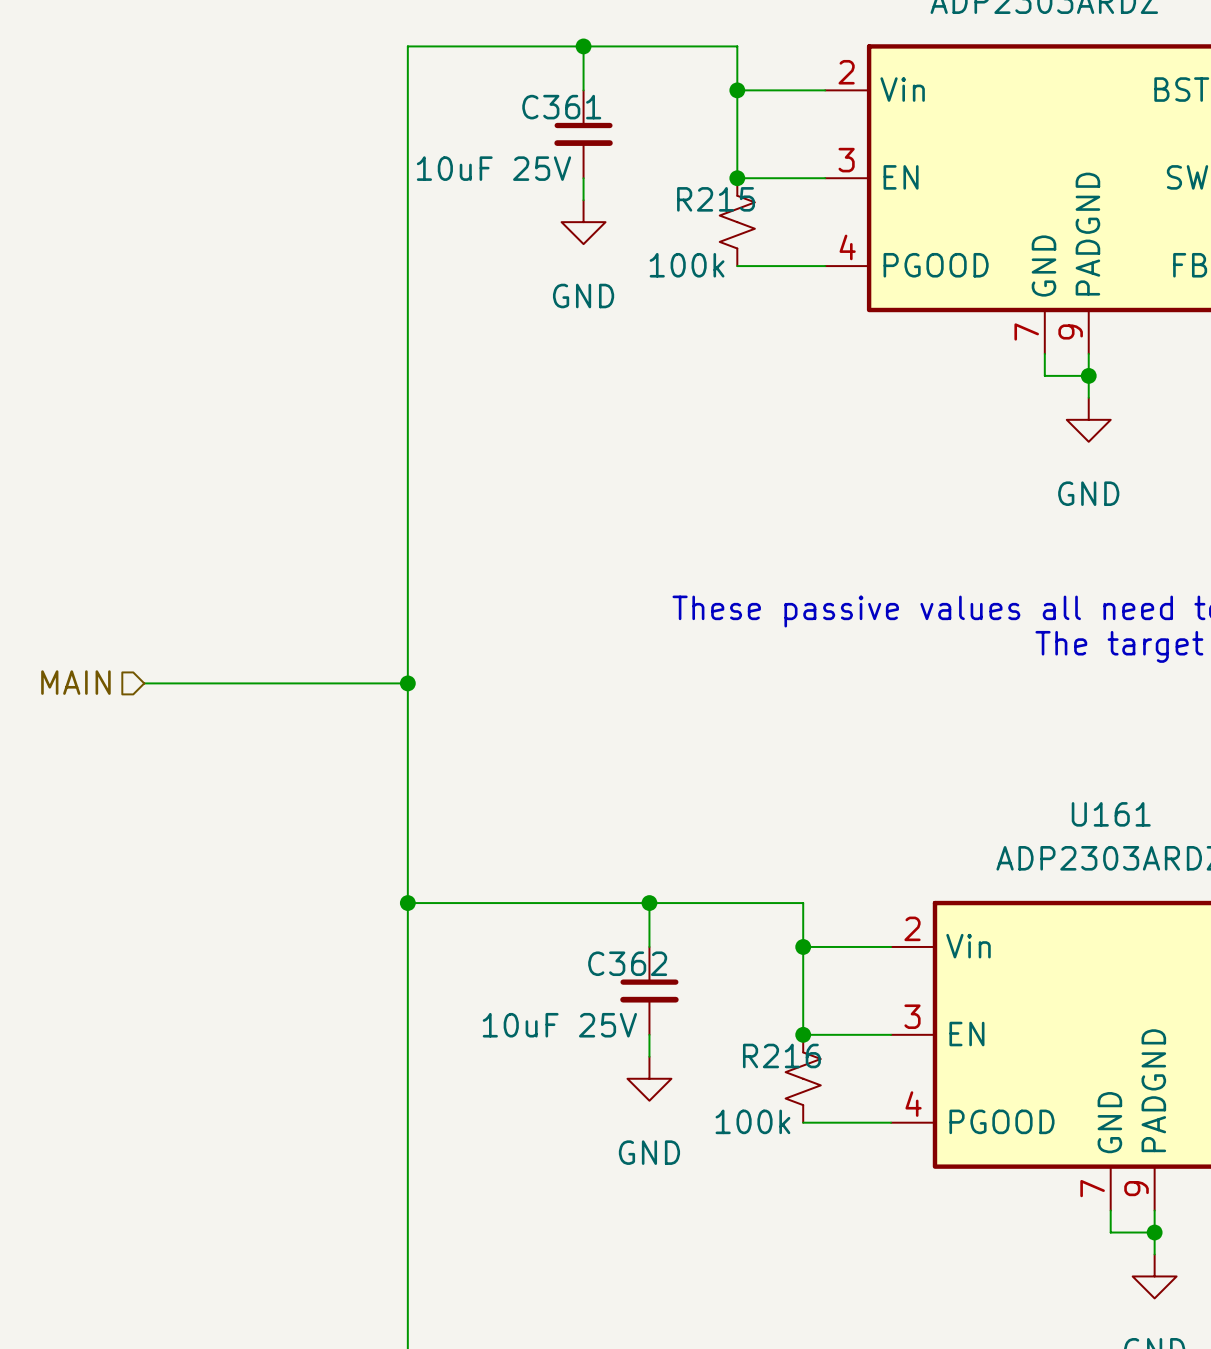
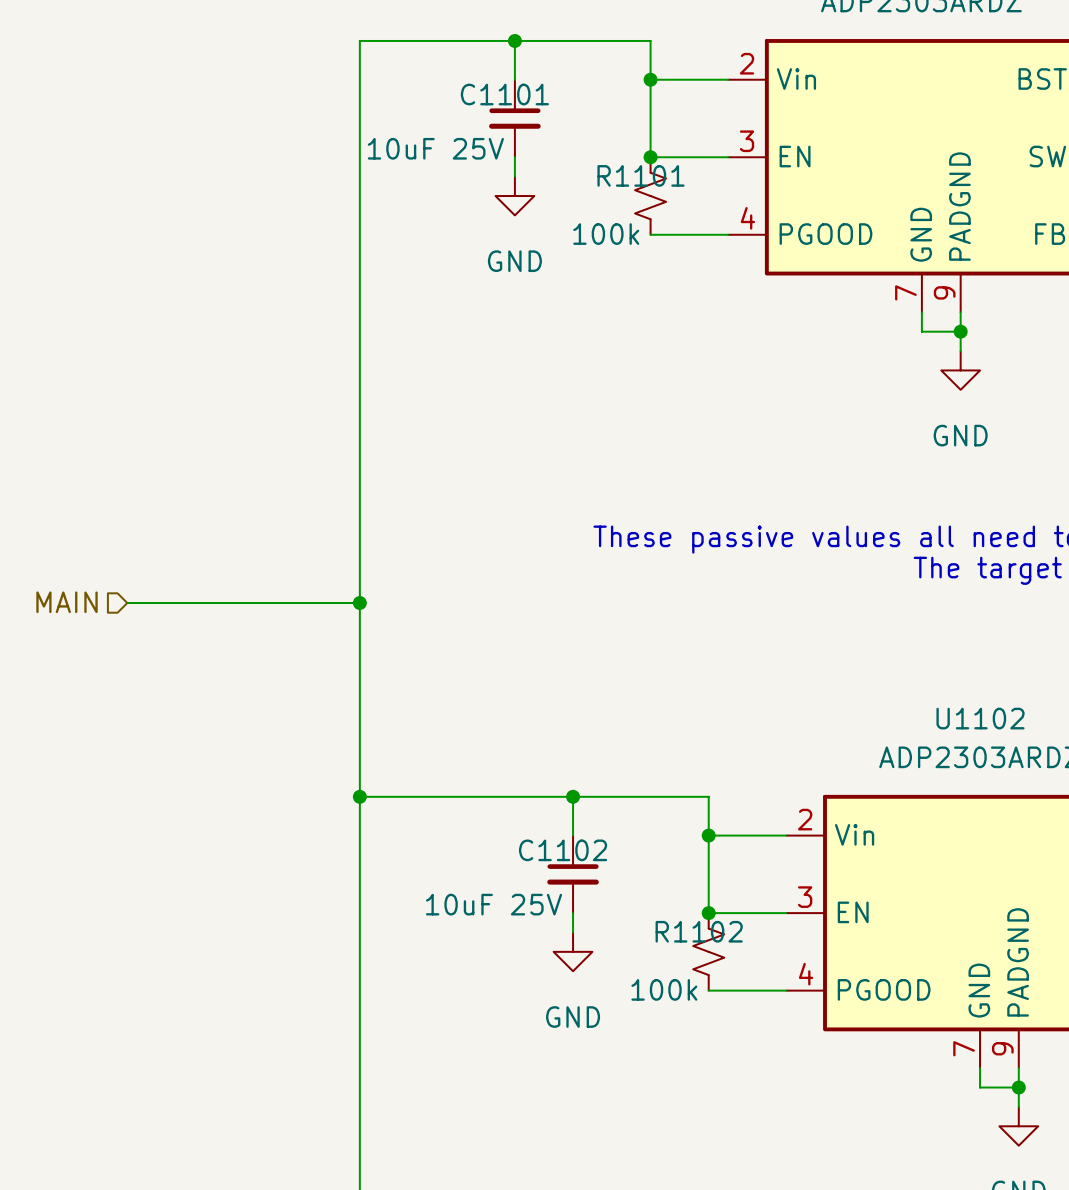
C361 name: C361 (561, 107) -> C1101 (504, 94)
R215 name: R215 (716, 199) -> R1101 (641, 175)
U161 name: U161 (1111, 814) -> U1102 (980, 718)
C362 name: C362 (627, 963) -> C1102 (563, 850)
R216 name: R216 (781, 1055) -> R1102 (699, 931)

